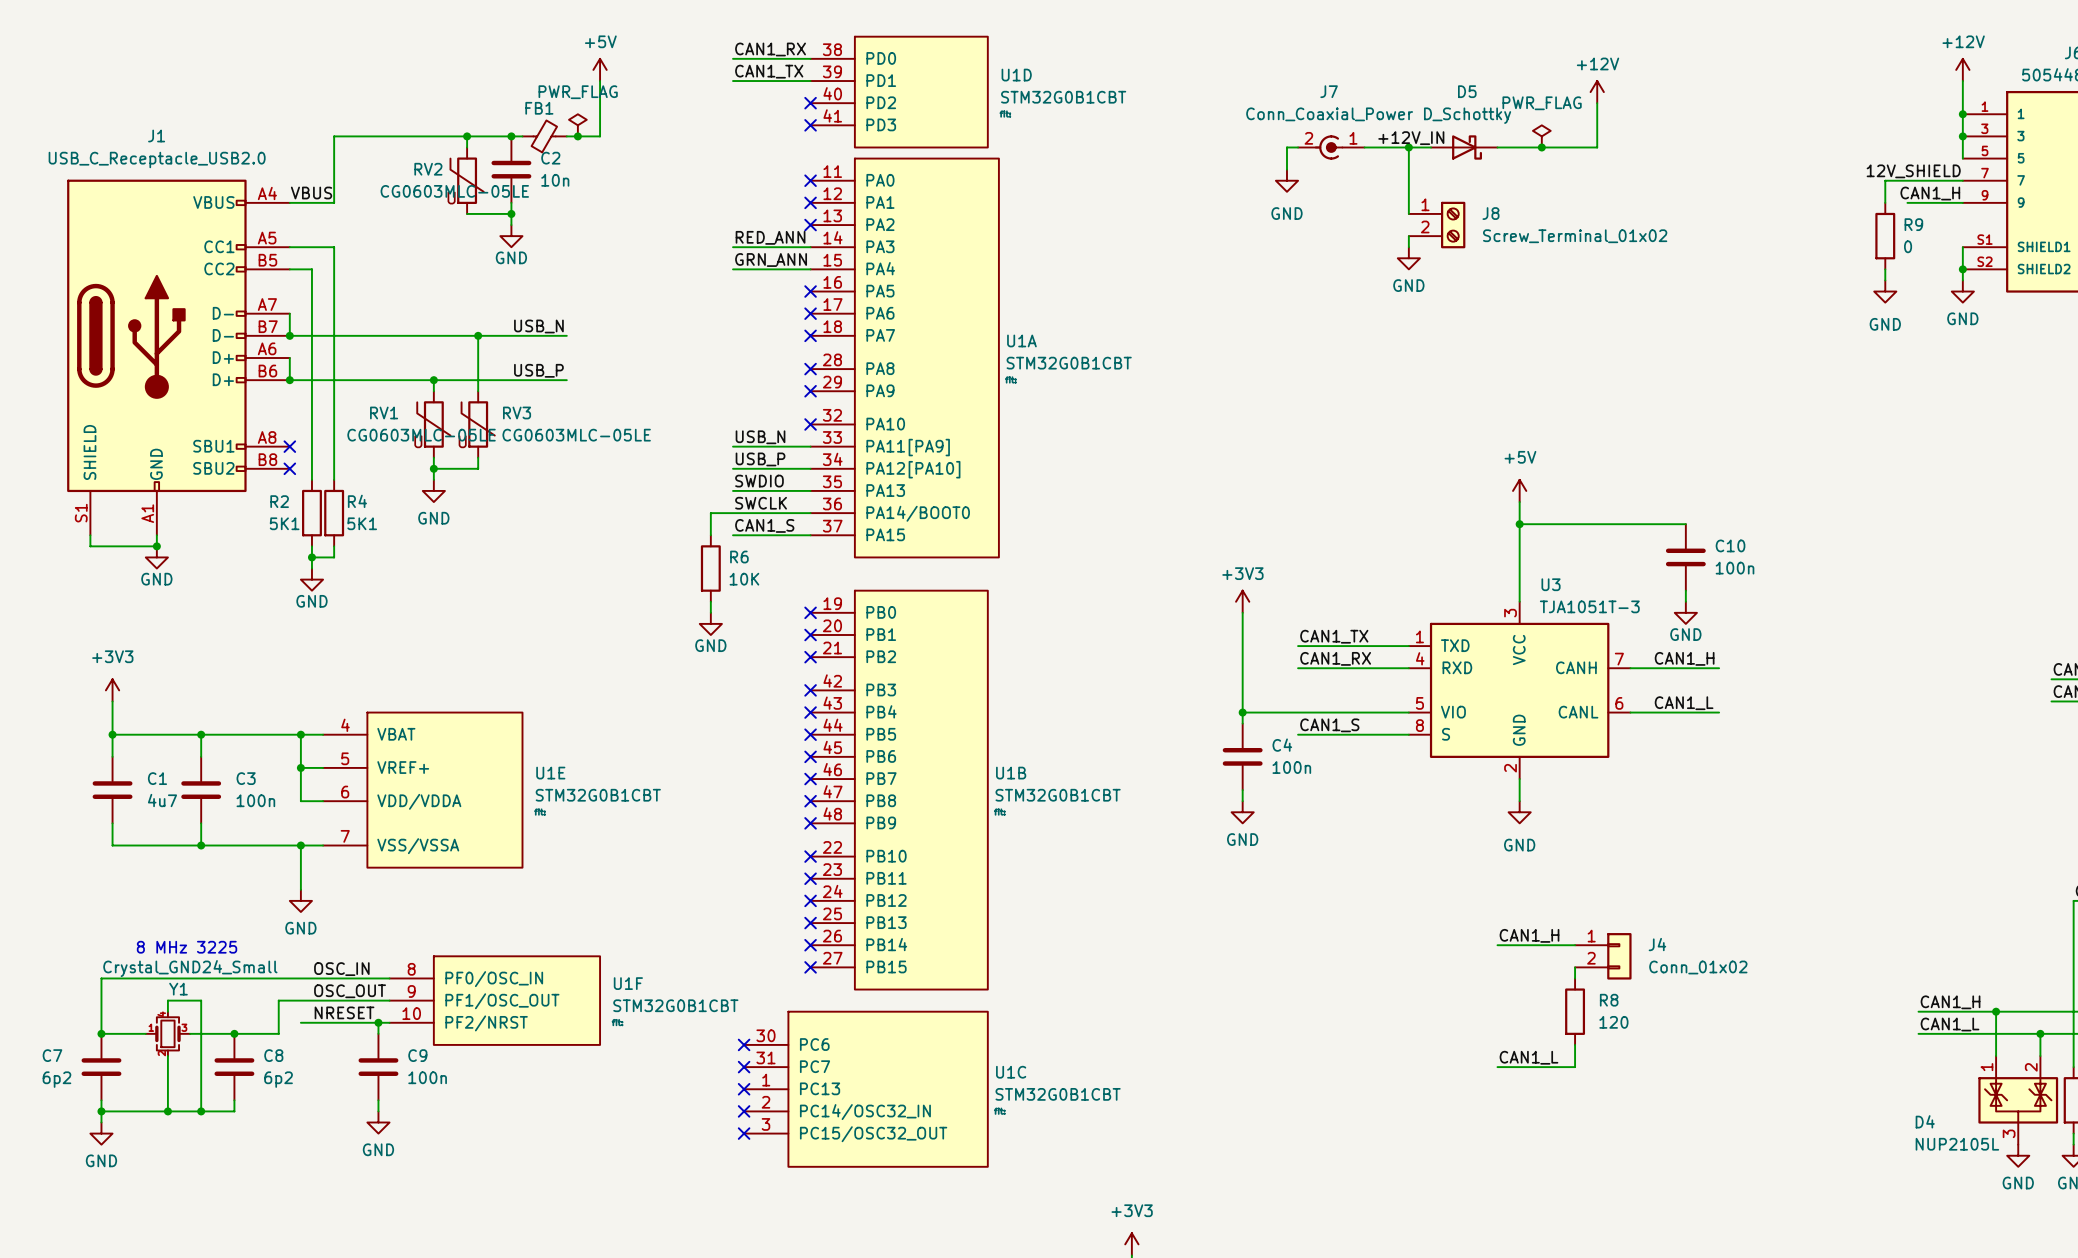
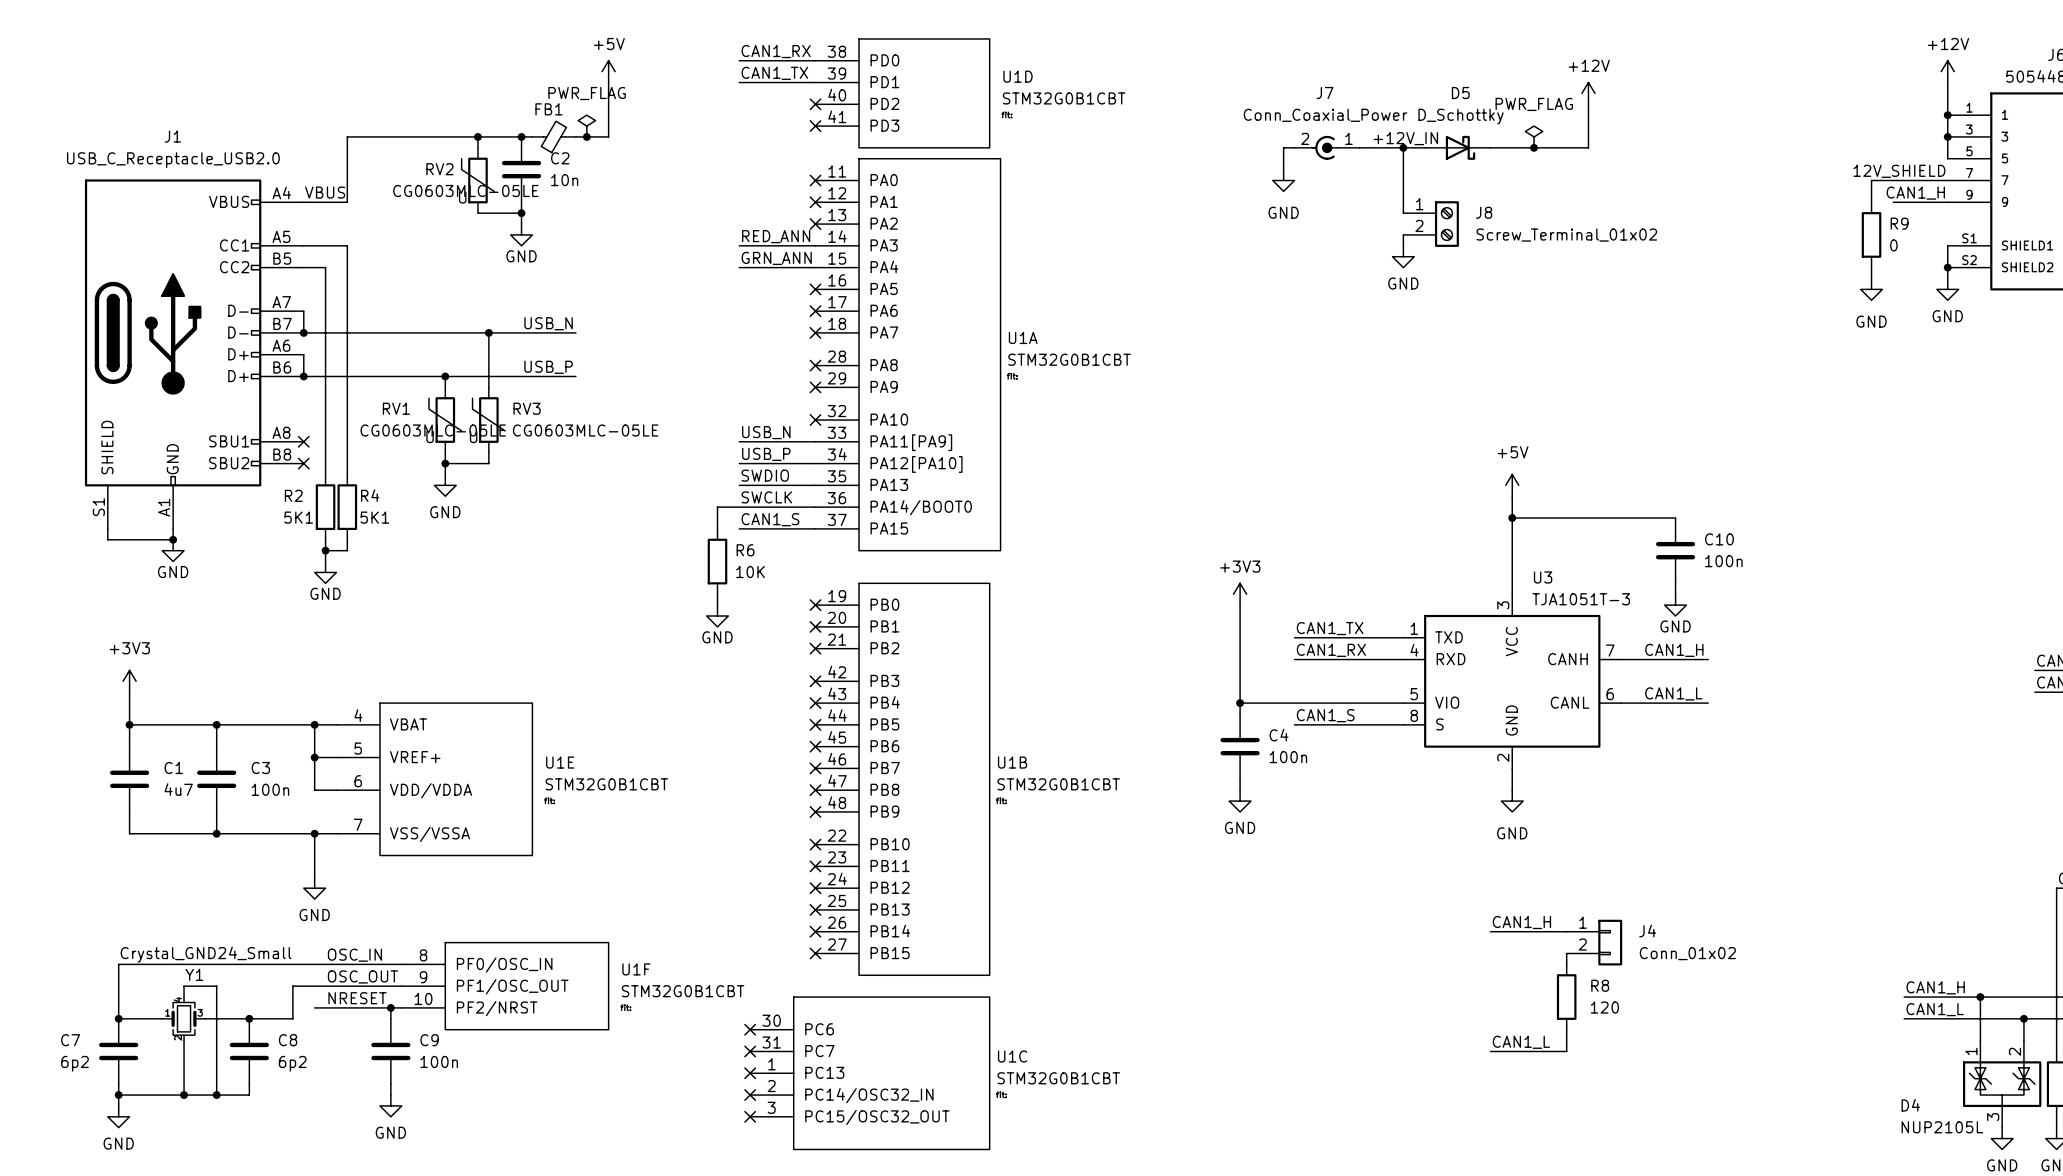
text: 8 MHz 3225 (187, 947) -> none

